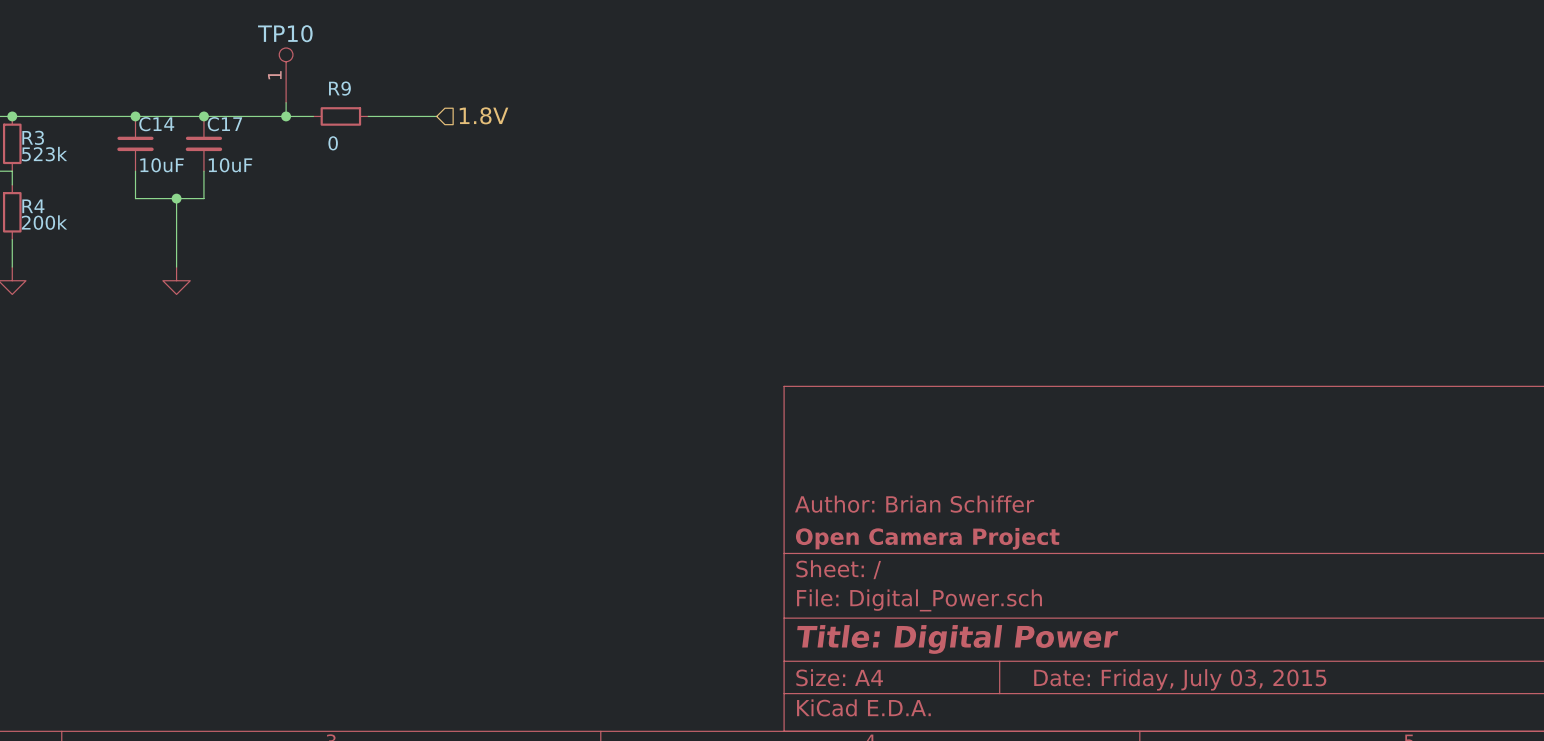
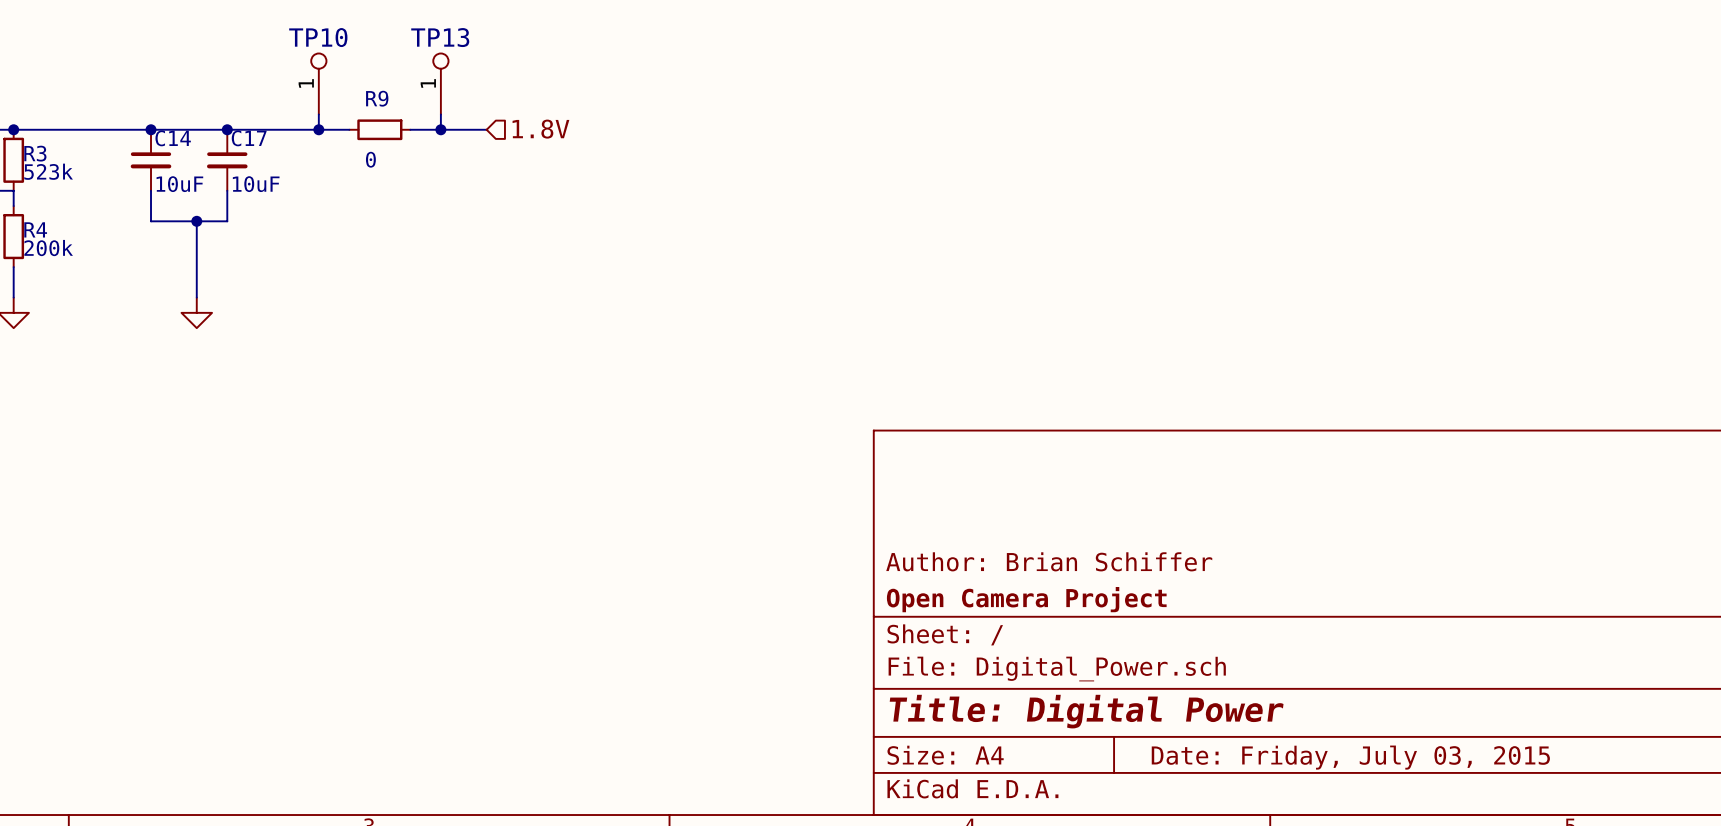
TP13: none -> (440, 83)
wire: none -> (440, 114) (440, 129)
junction: none -> (440, 129)

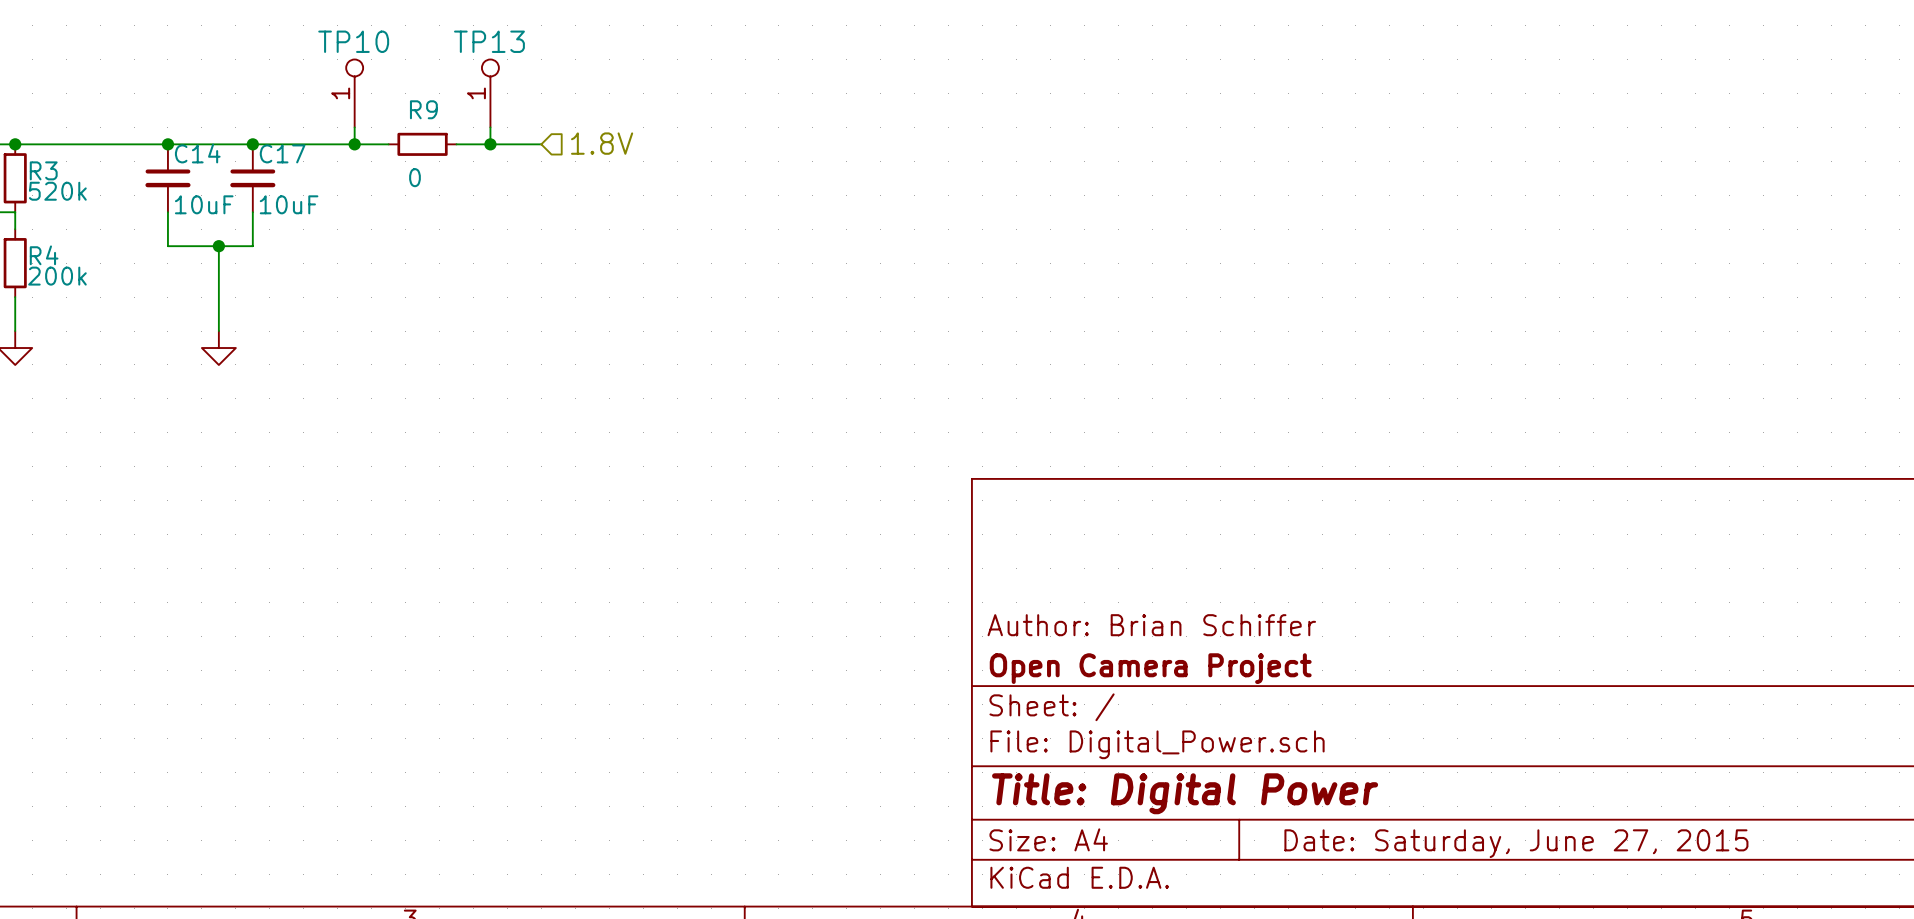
R3 value: 523k (48, 171) -> 520k (57, 191)
title block: Date: Friday, July 03, 2015 (1350, 757) -> Date: Saturday, June 27, 2015 (1516, 843)

